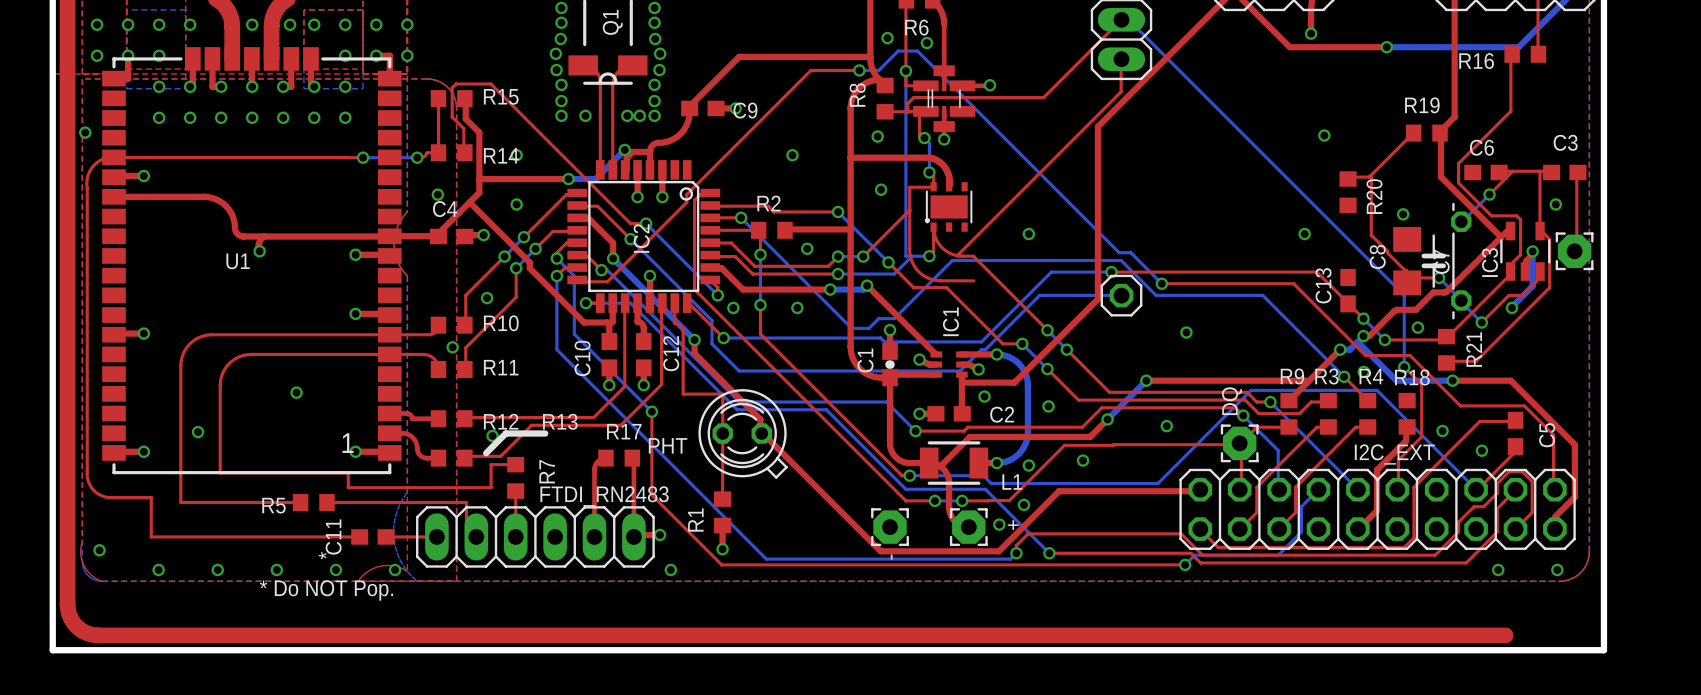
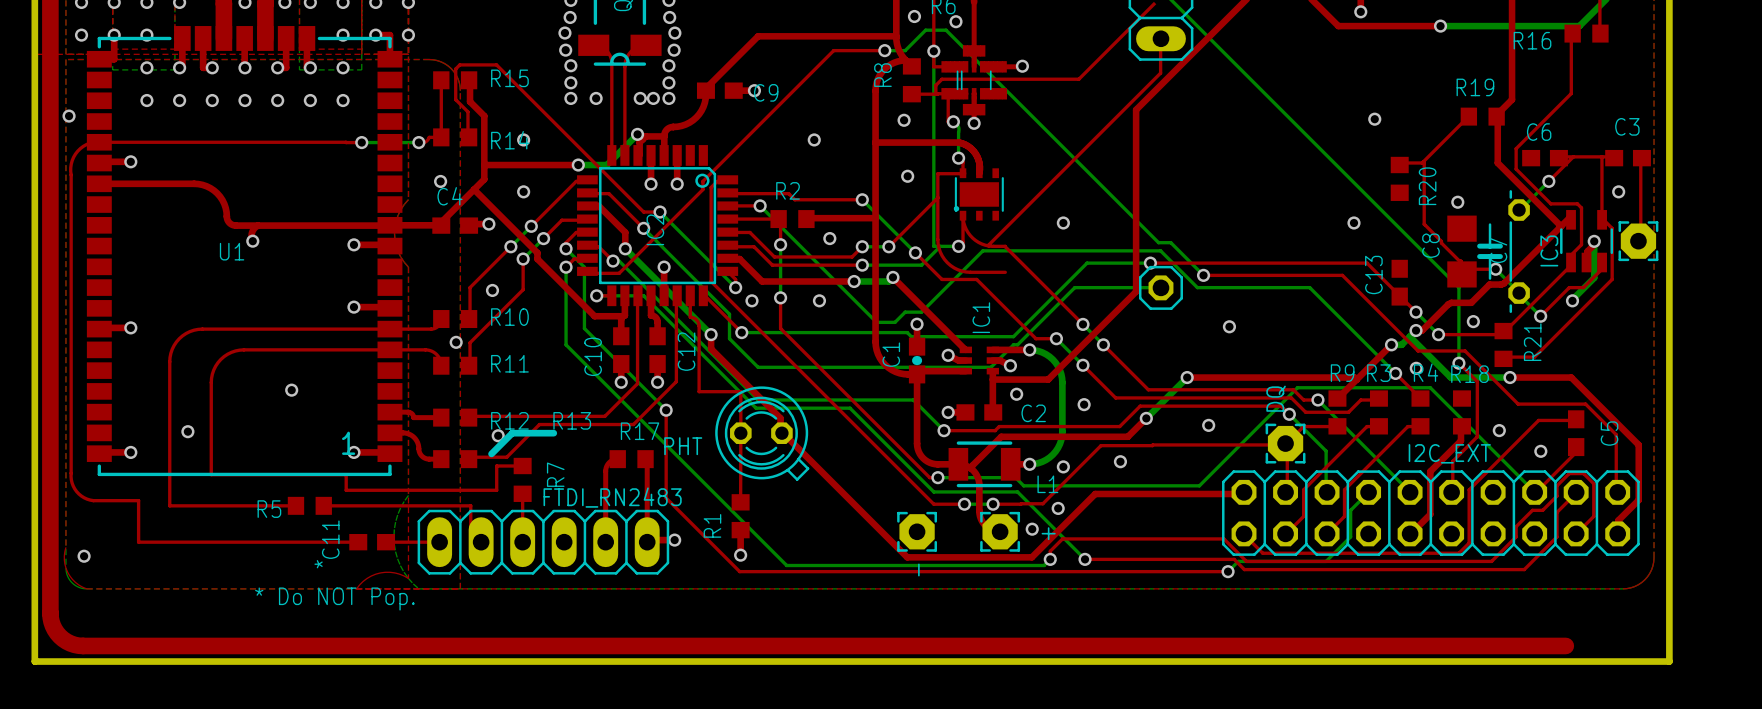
via: (158, 569) -> none
via: (217, 569) -> none
via: (276, 569) -> none
via: (335, 569) -> none
via: (395, 569) -> none
via: (670, 569) -> none
via: (1498, 569) -> none
via: (1557, 569) -> none

